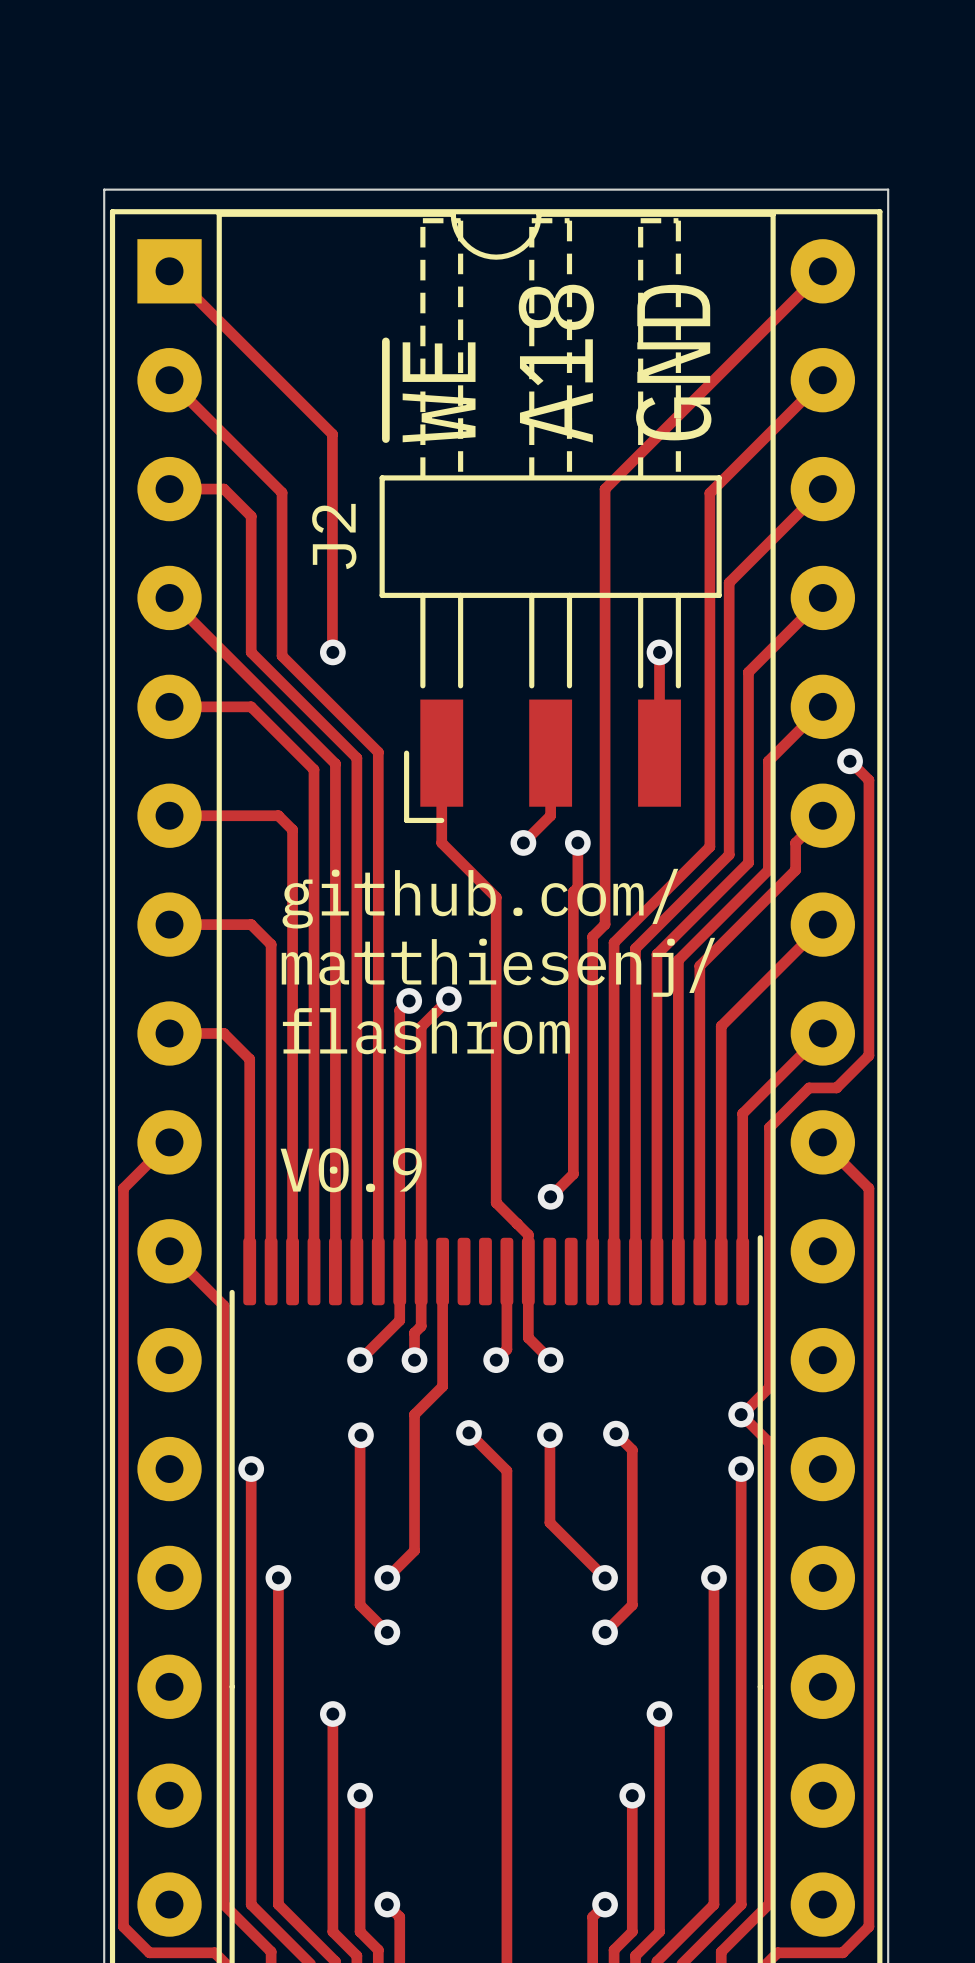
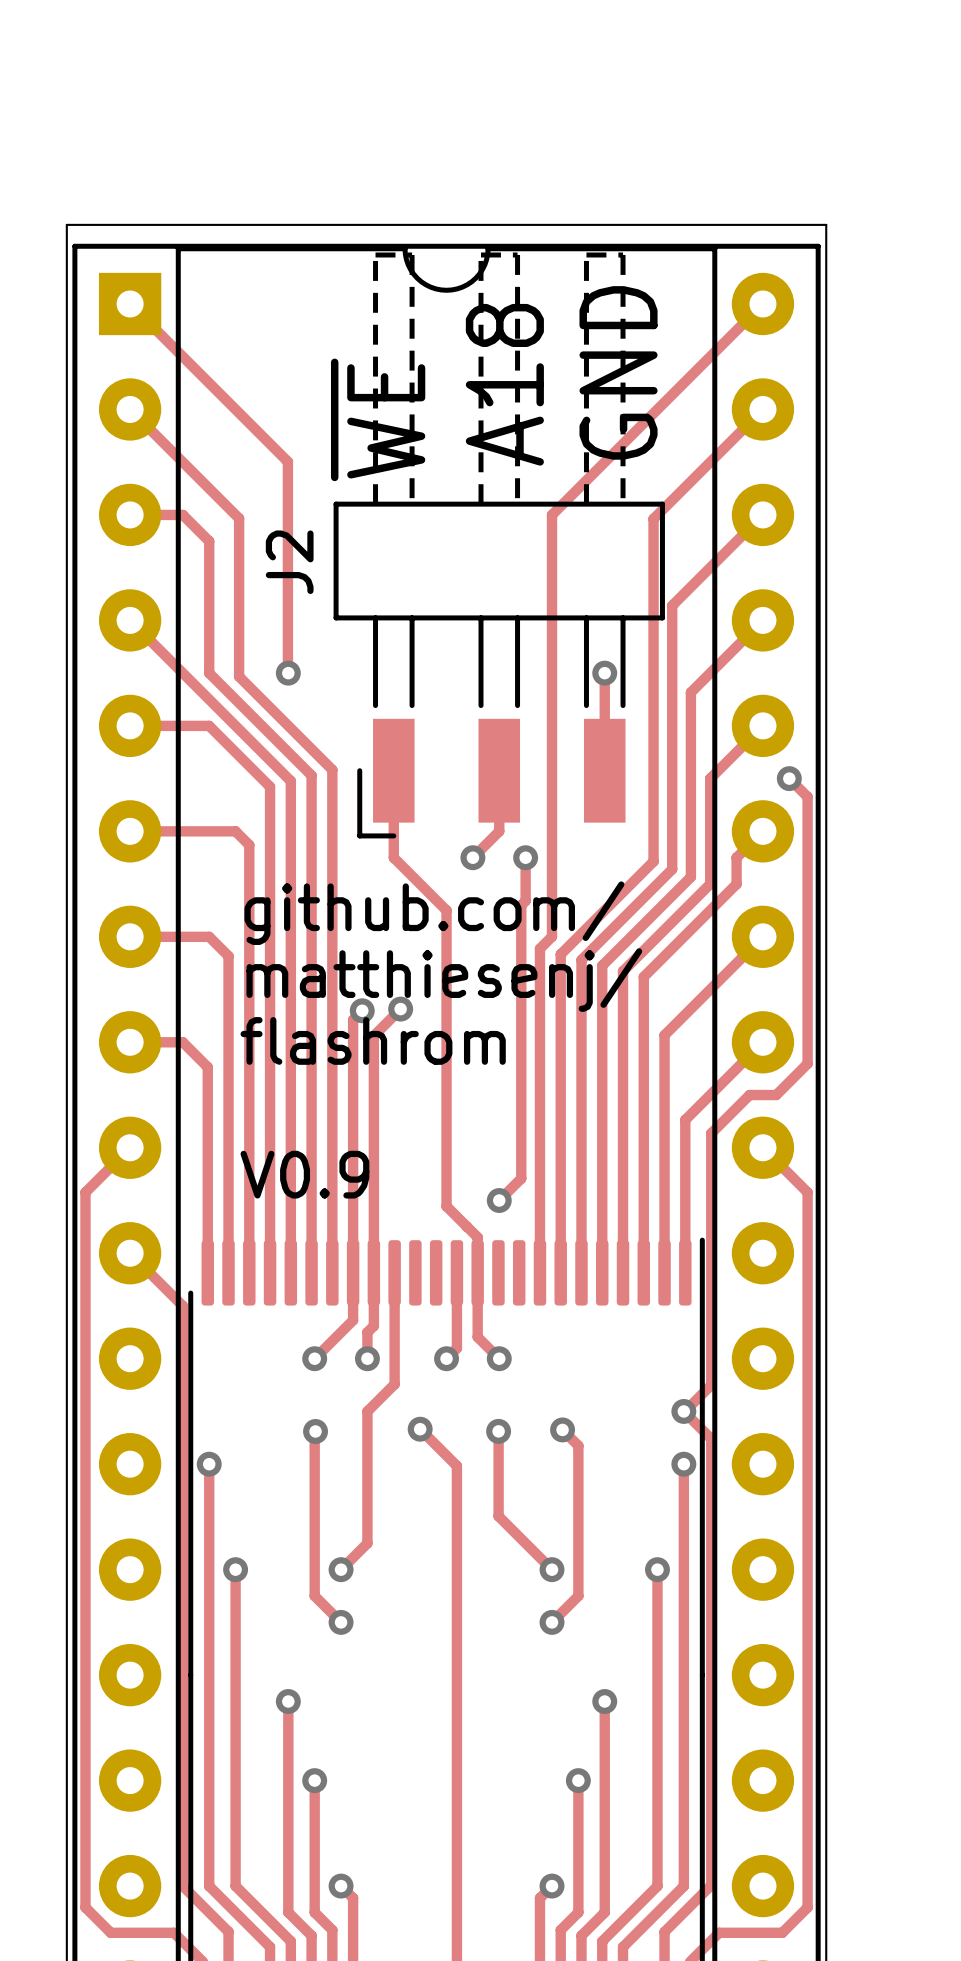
text position: ~{WE} (430, 391) -> ~{WE} (378, 419)

